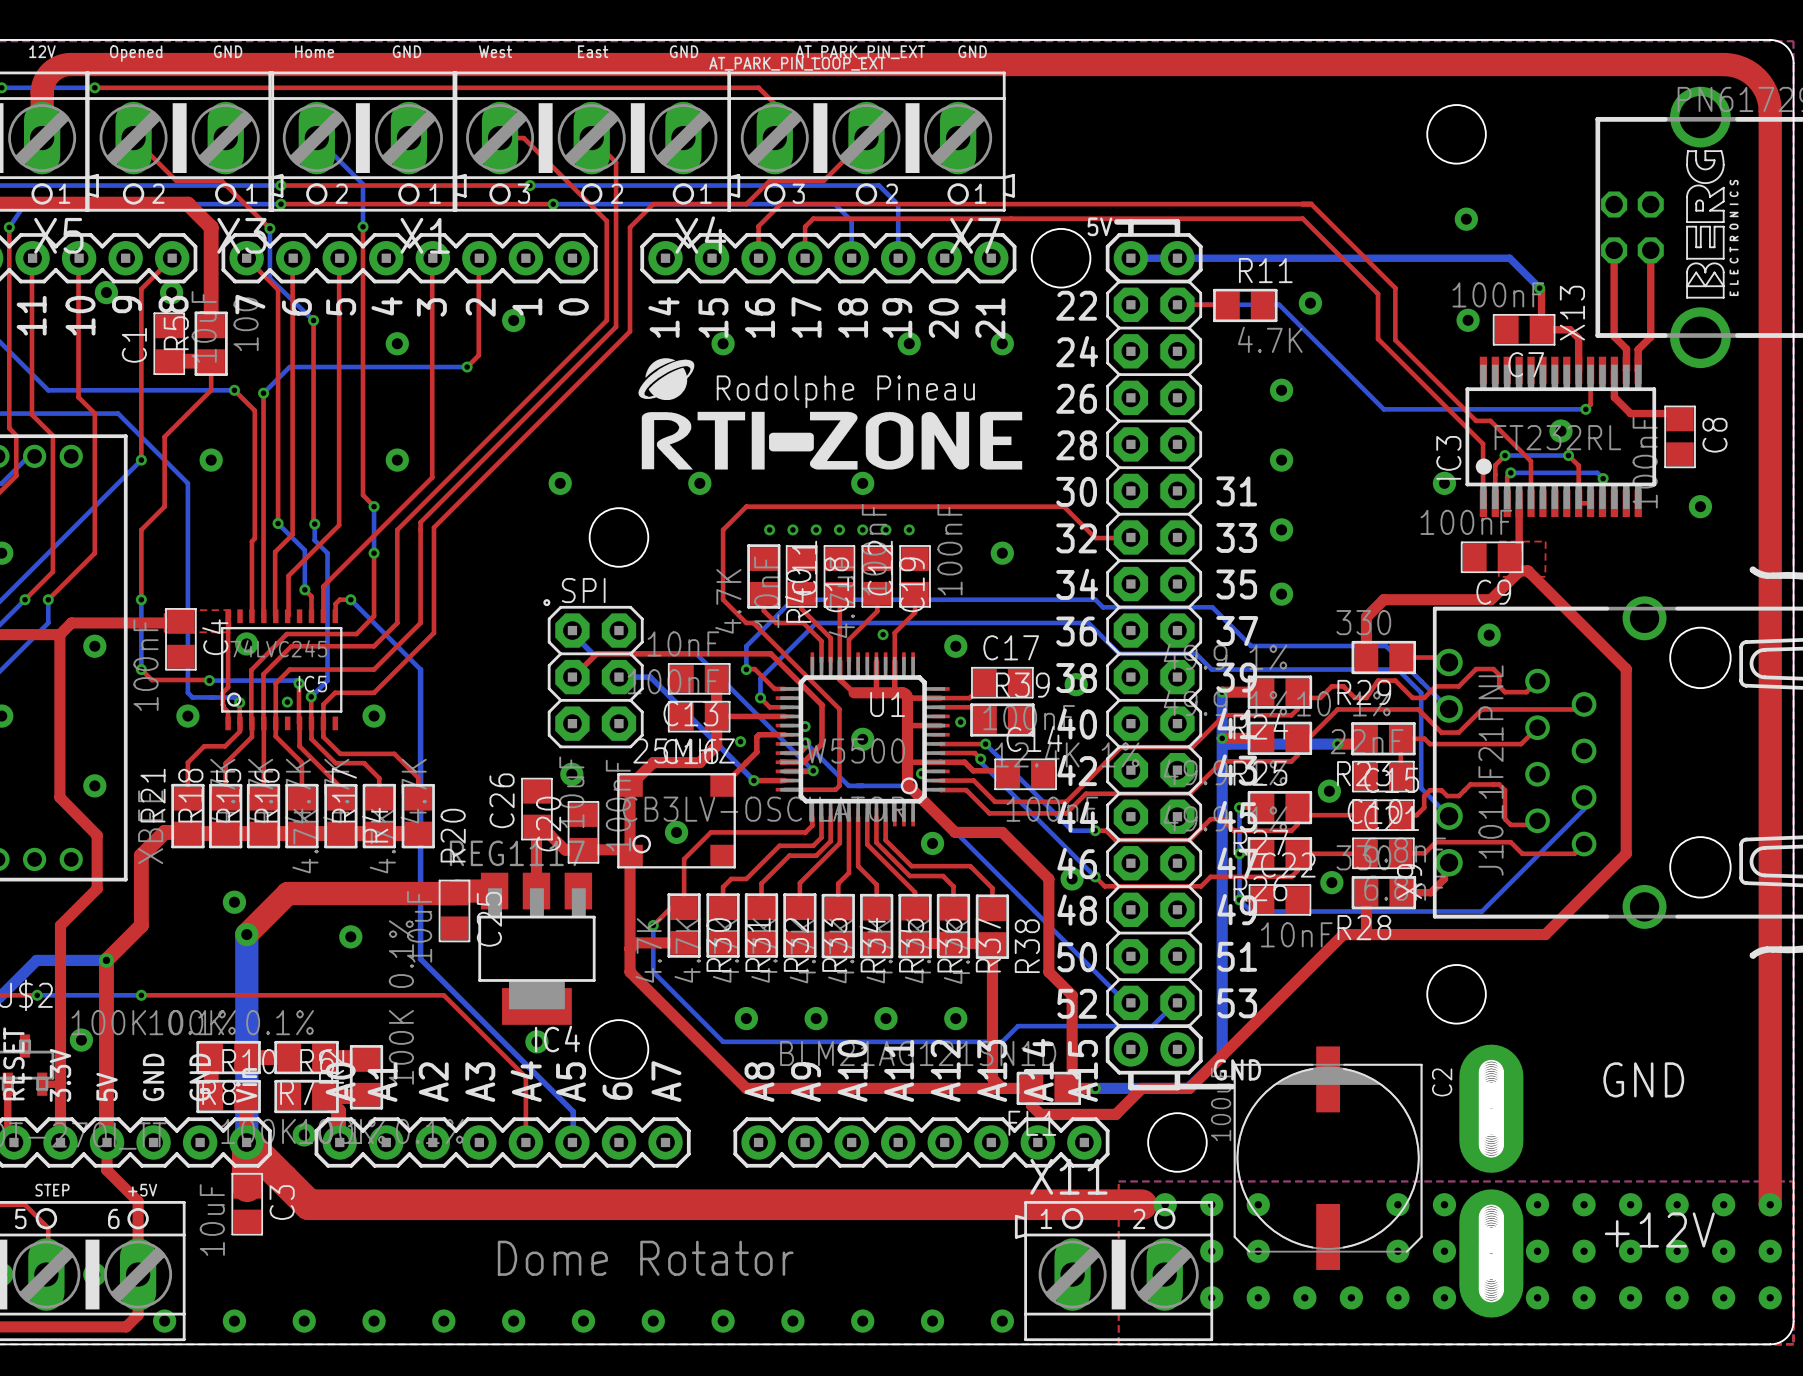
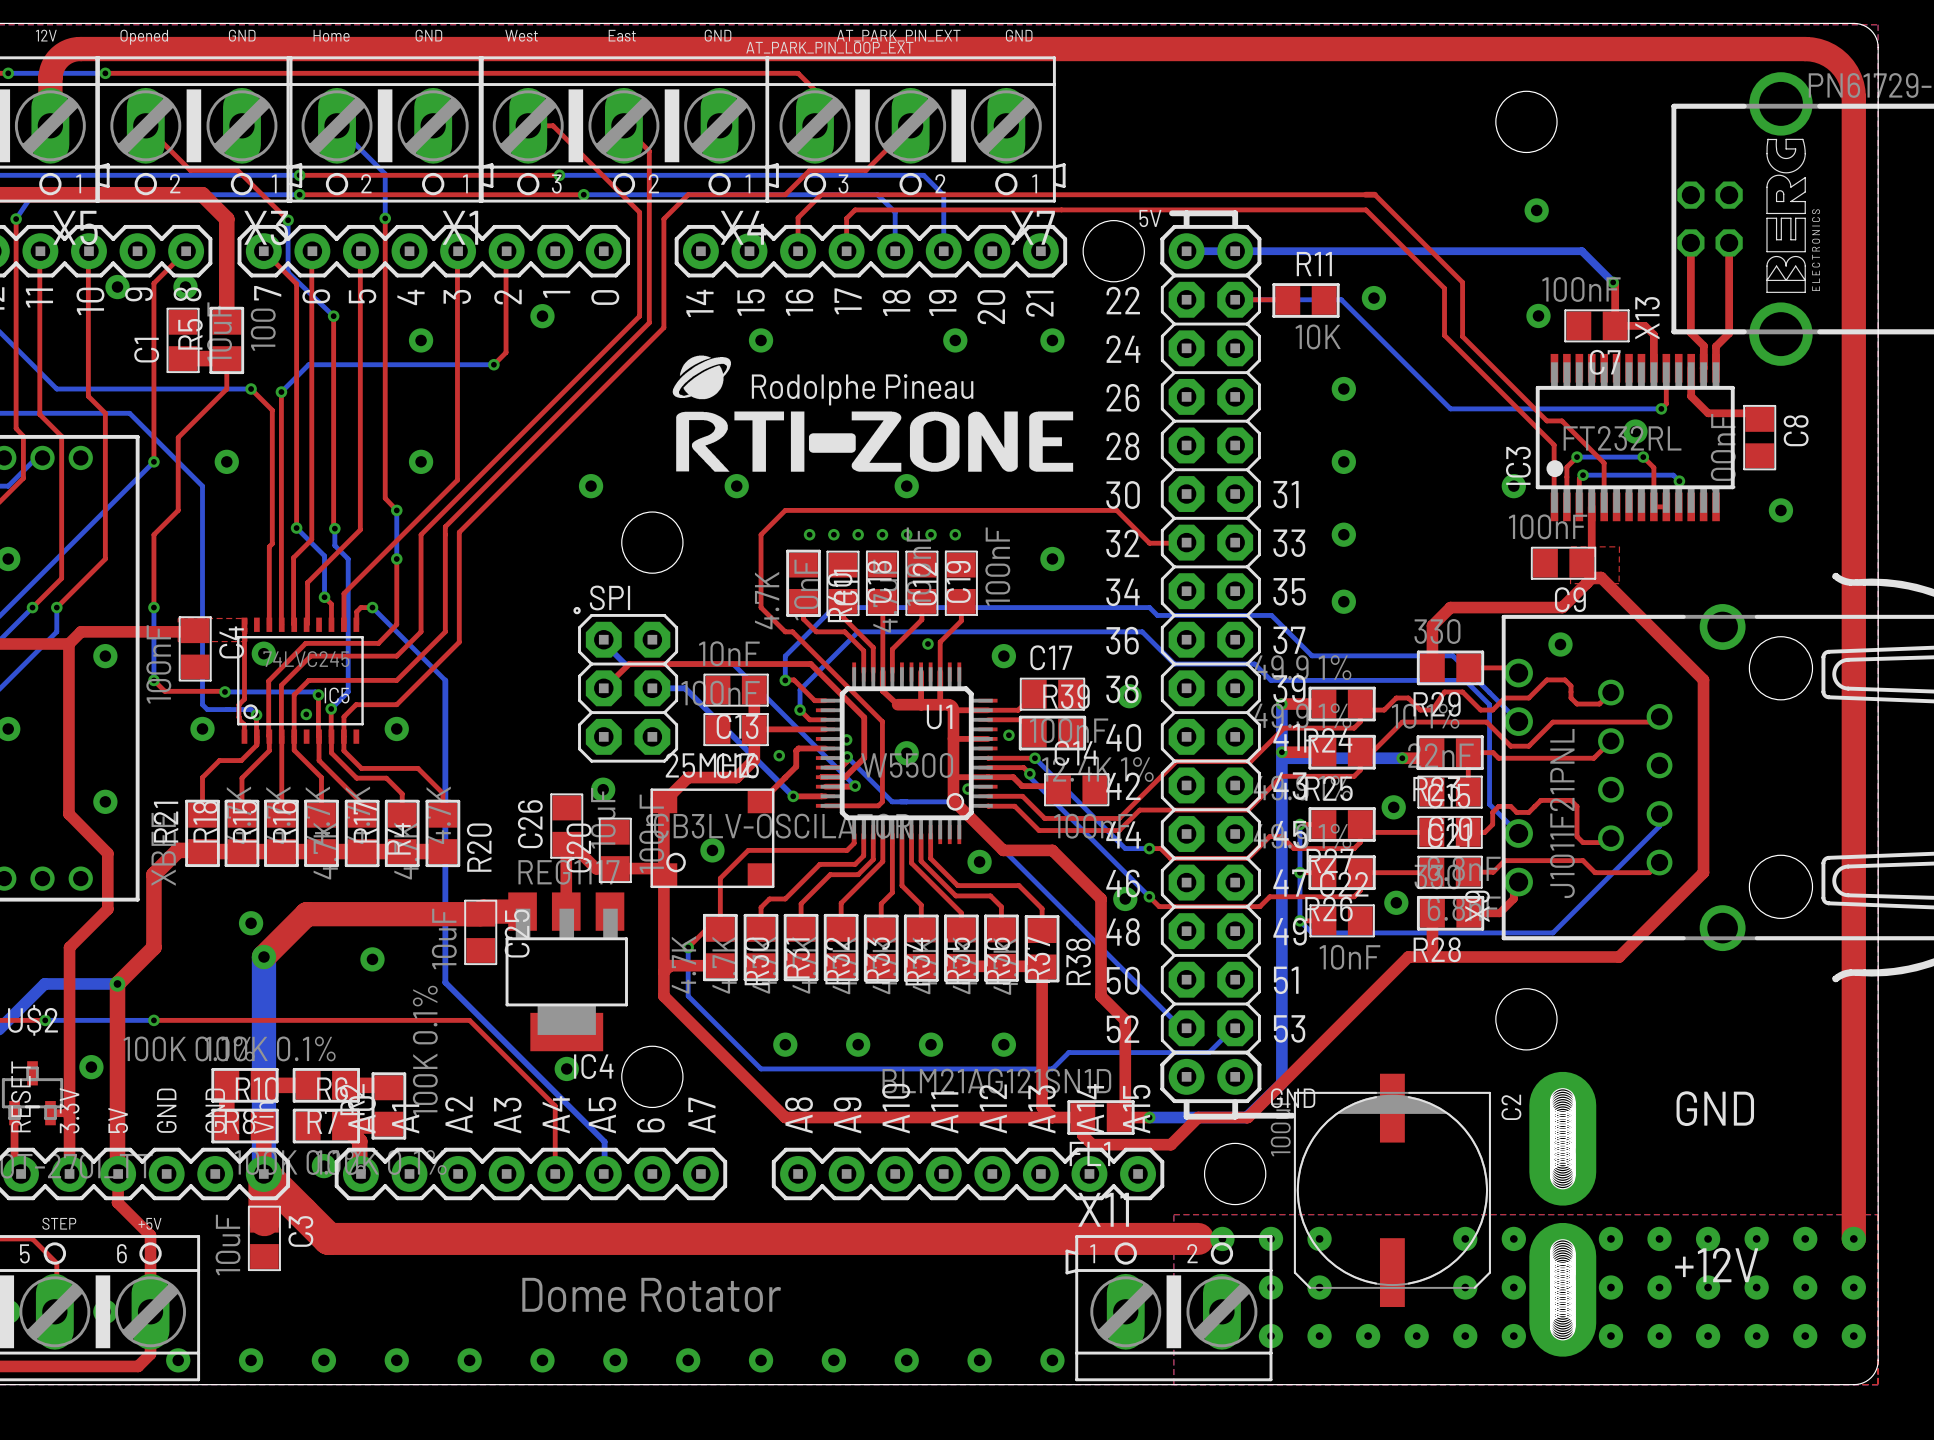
R11 value: 4.7K (1270, 339) -> 10K (1318, 336)

